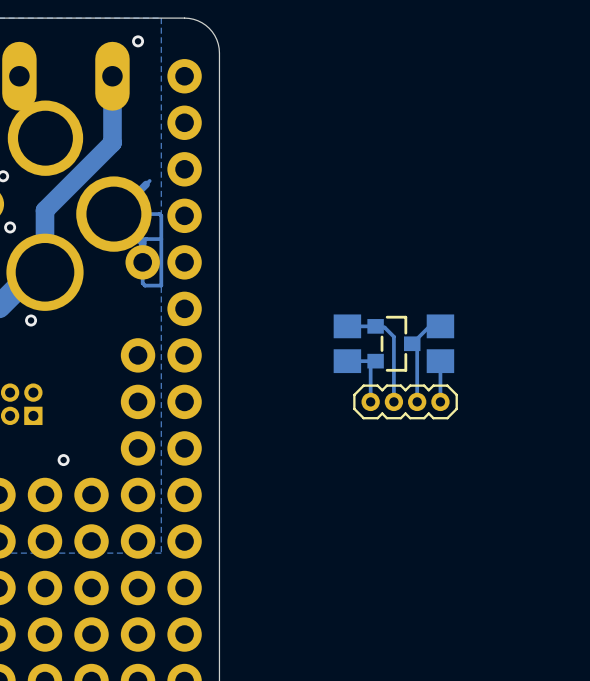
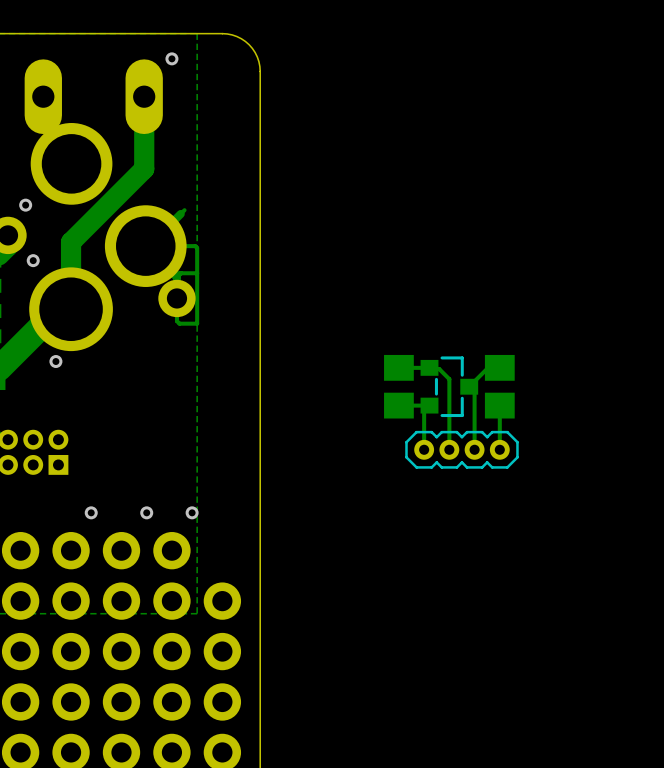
part: (184, 285) -> none
part: (138, 401) -> none
via: none -> (146, 512)
via: none -> (192, 512)

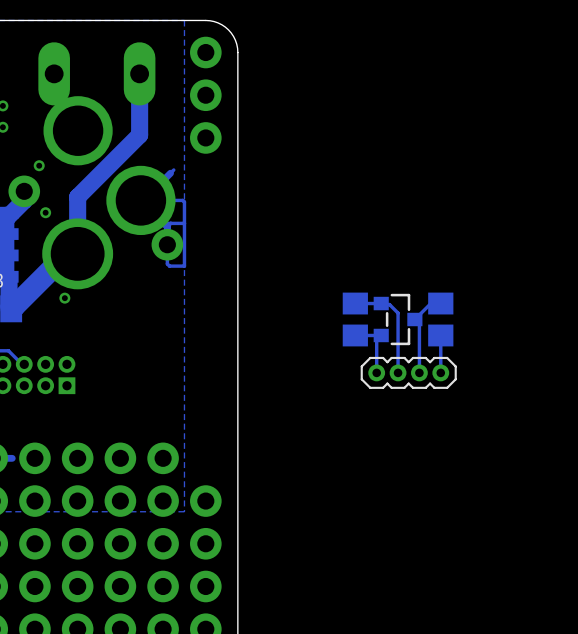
via: (171, 58) -> none
part: none -> (205, 95)
via: (91, 512) -> none
via: (146, 512) -> none
via: (192, 512) -> none

